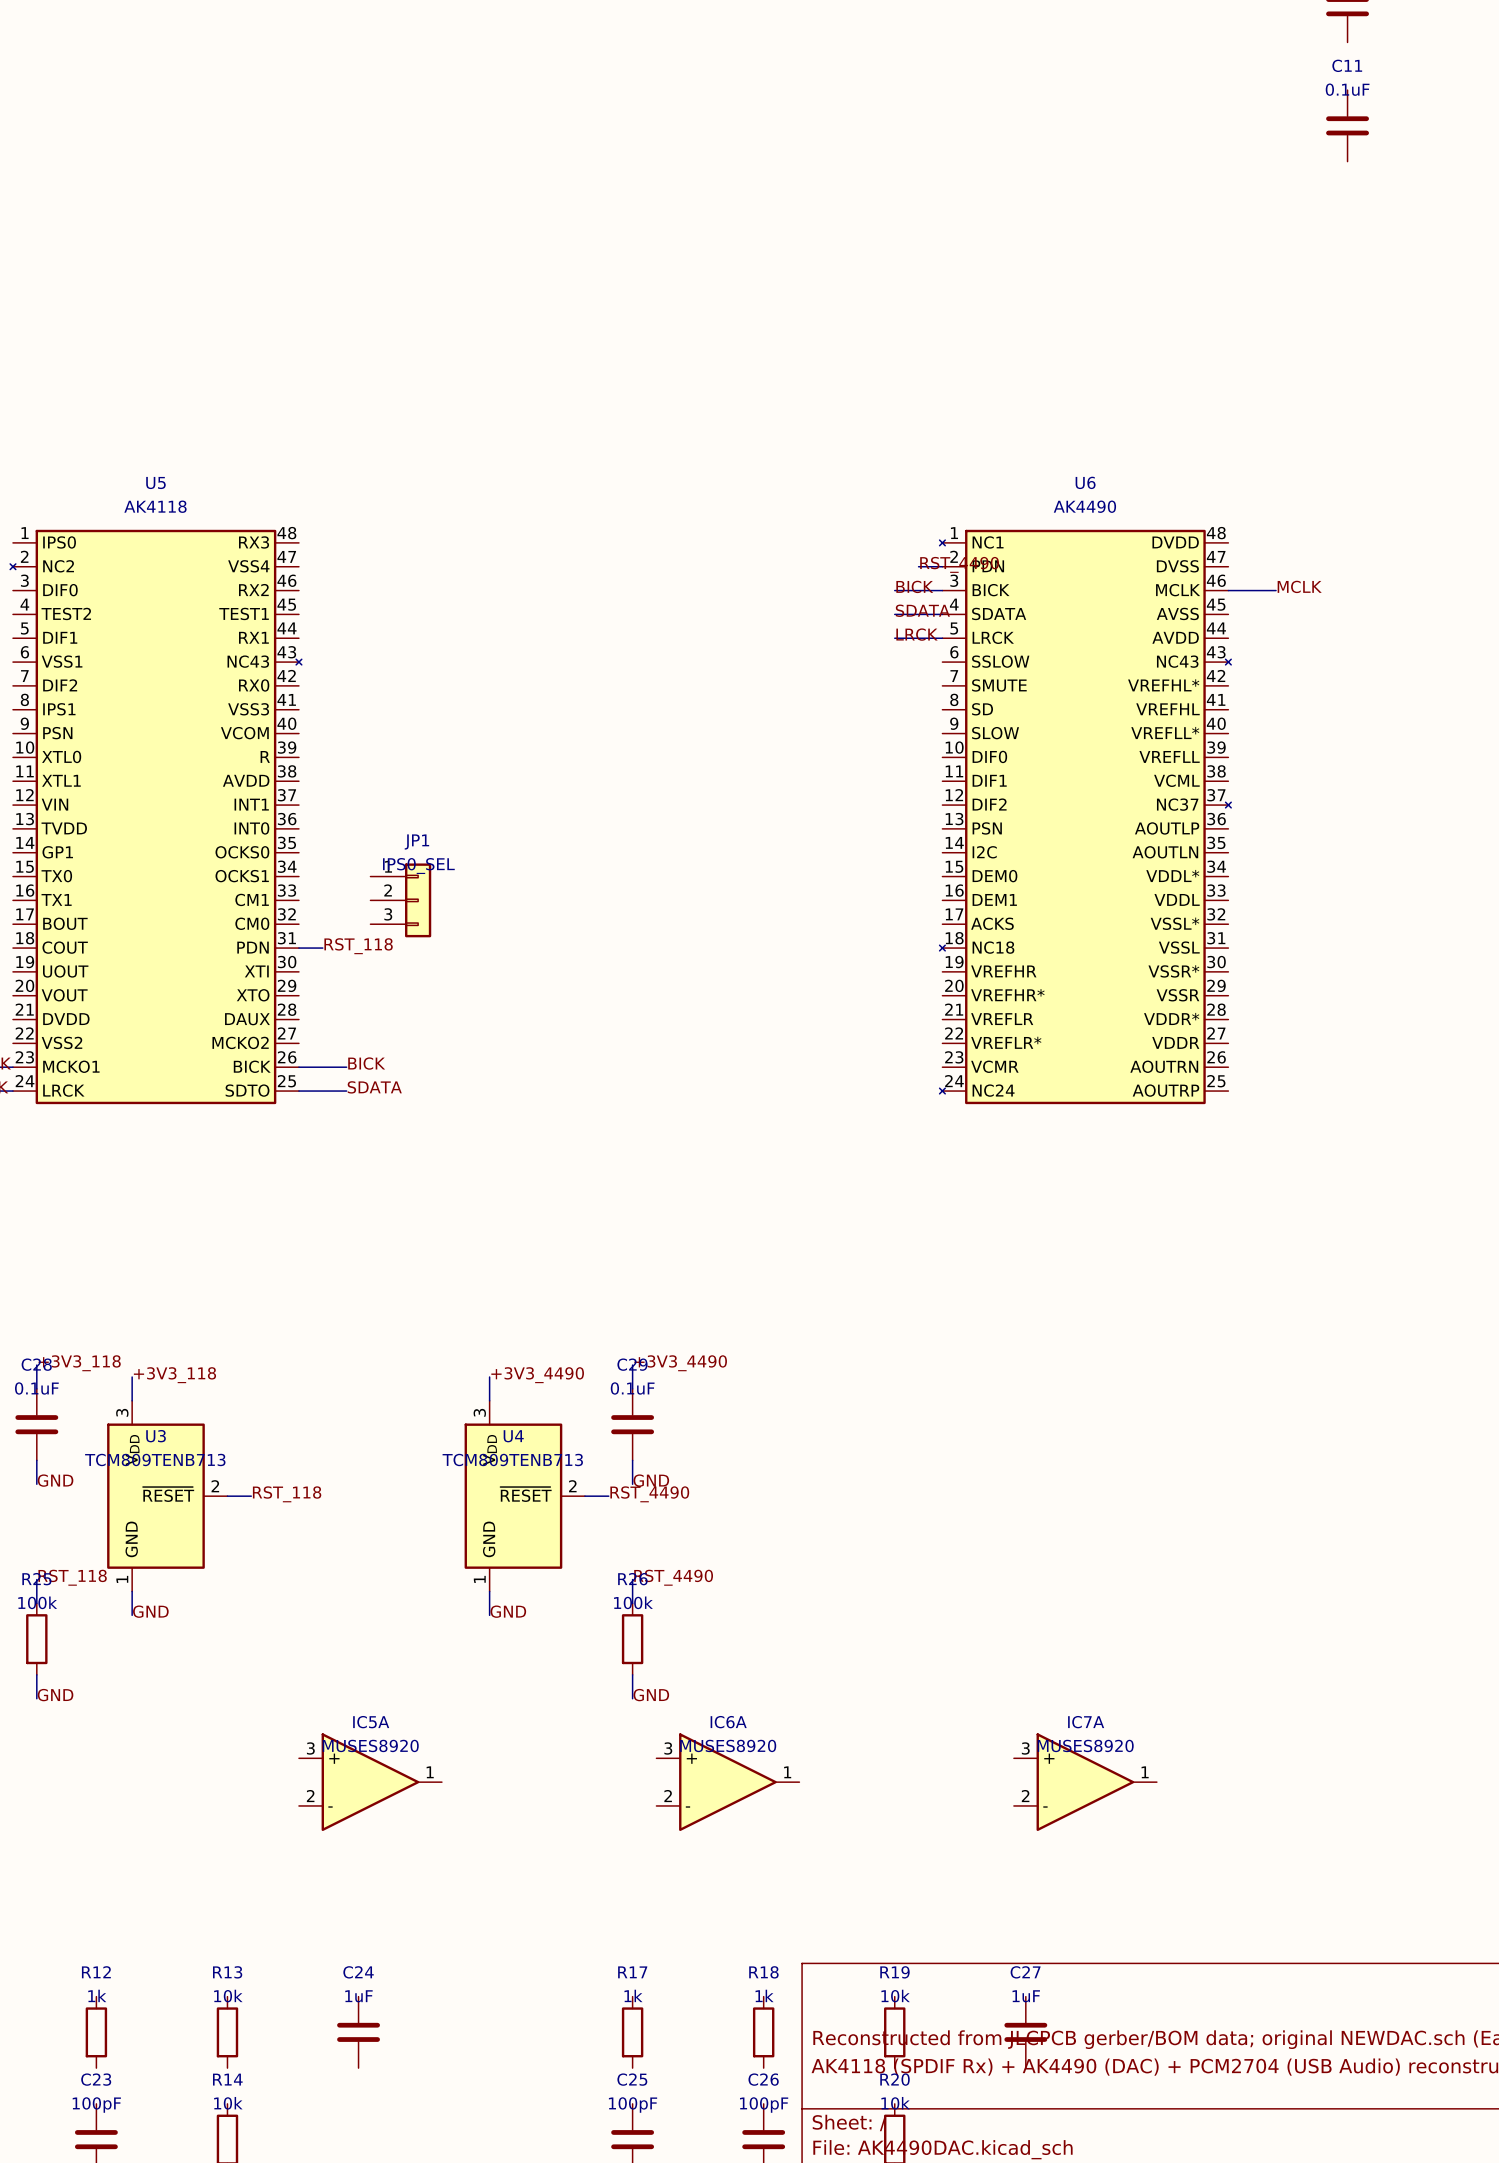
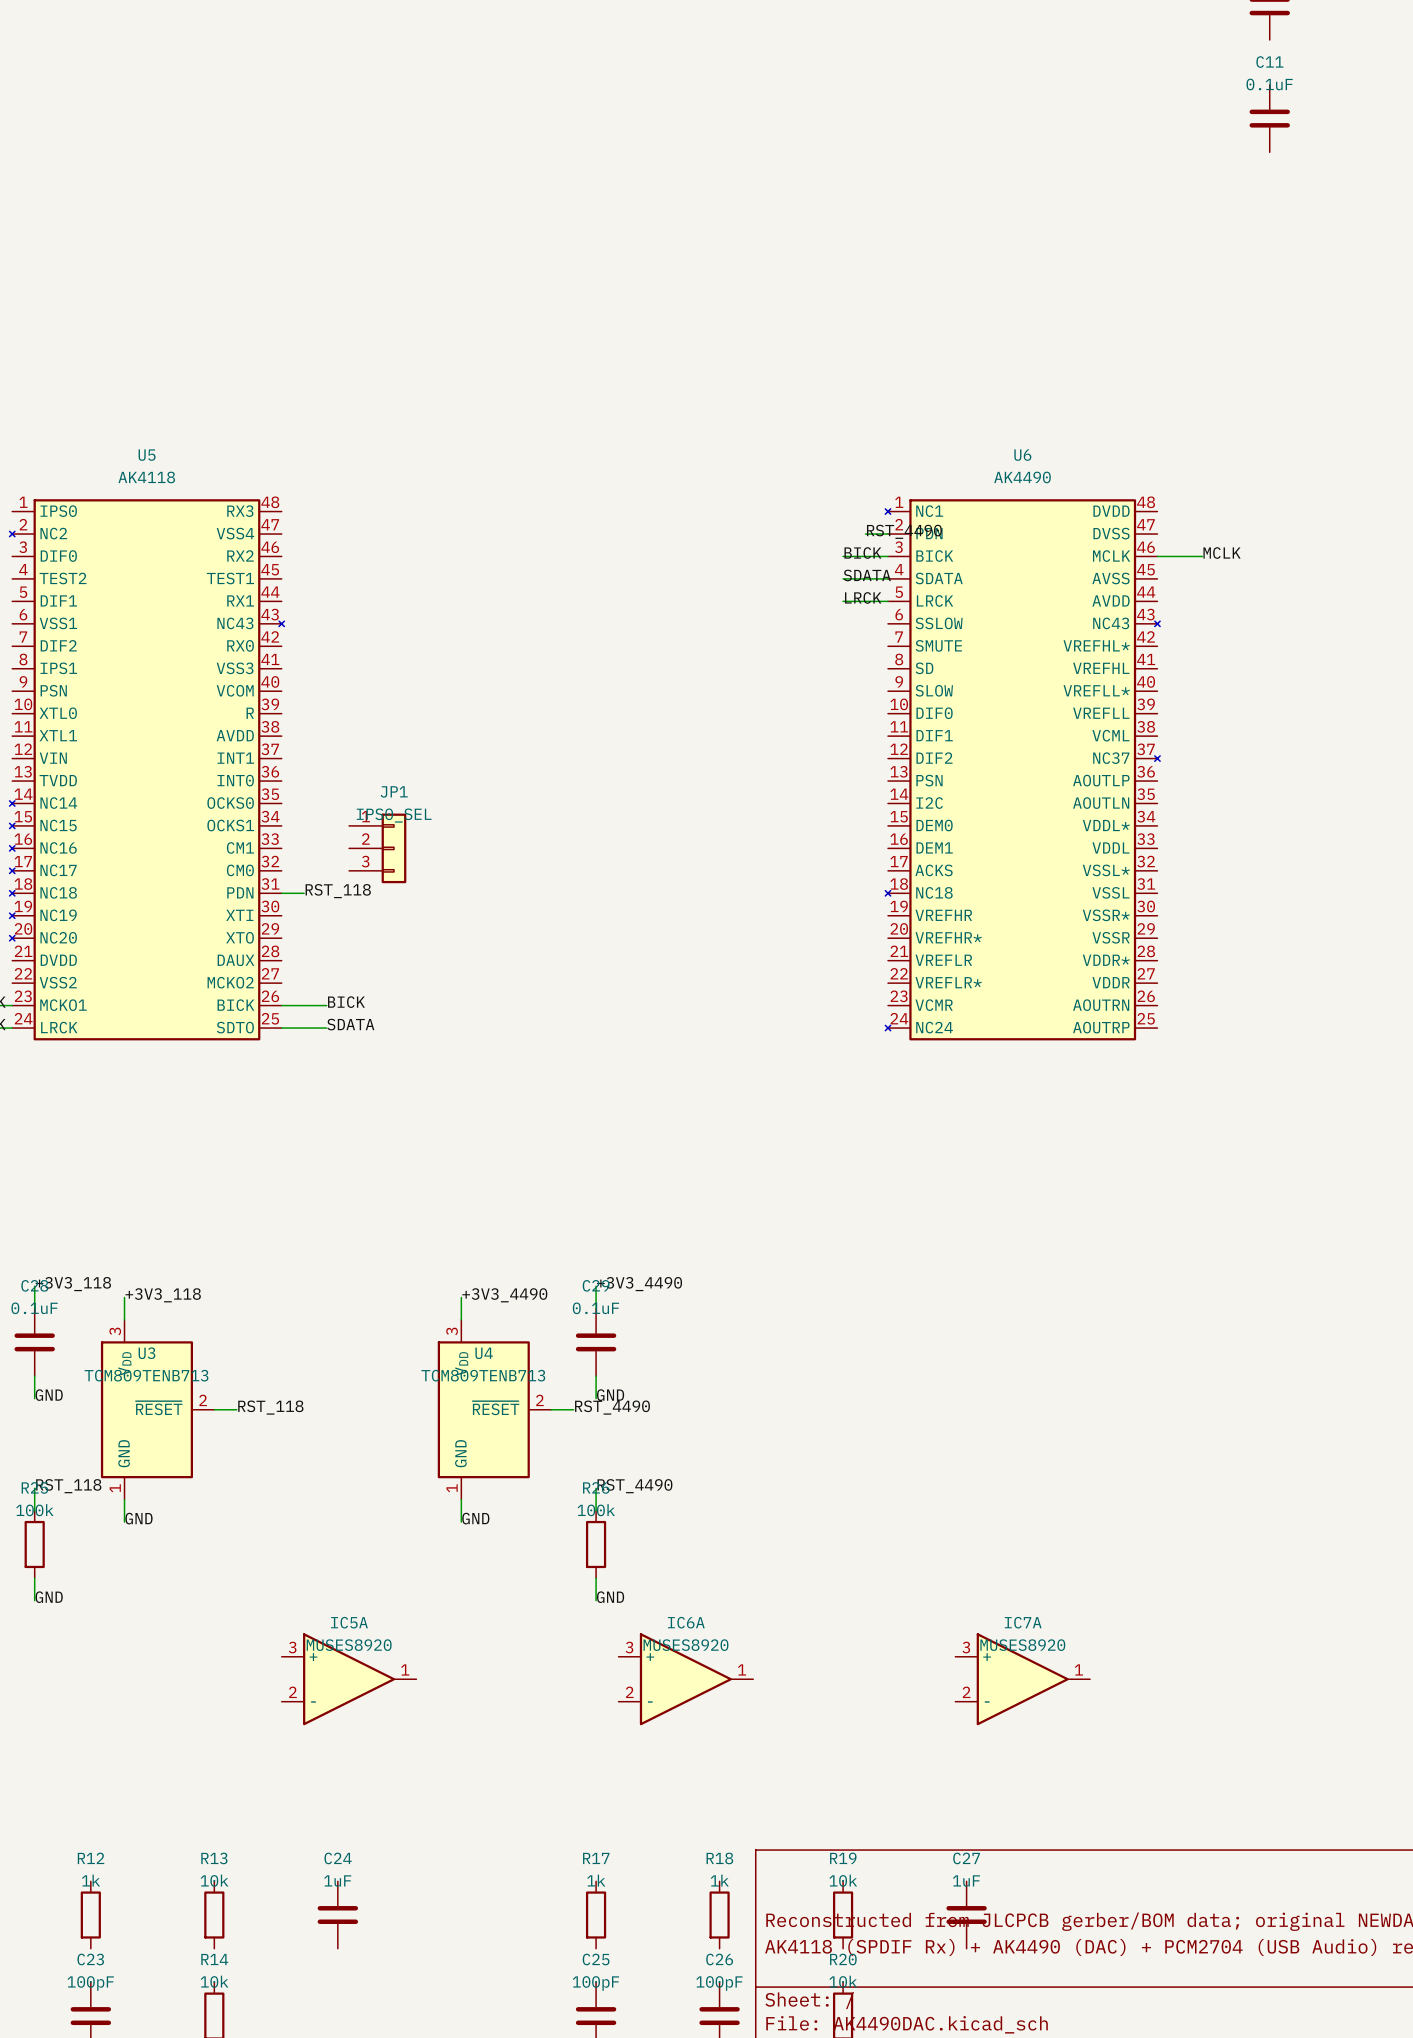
U5 symbol: [10, 529, 302, 1105] -> [9, 499, 285, 1041]

